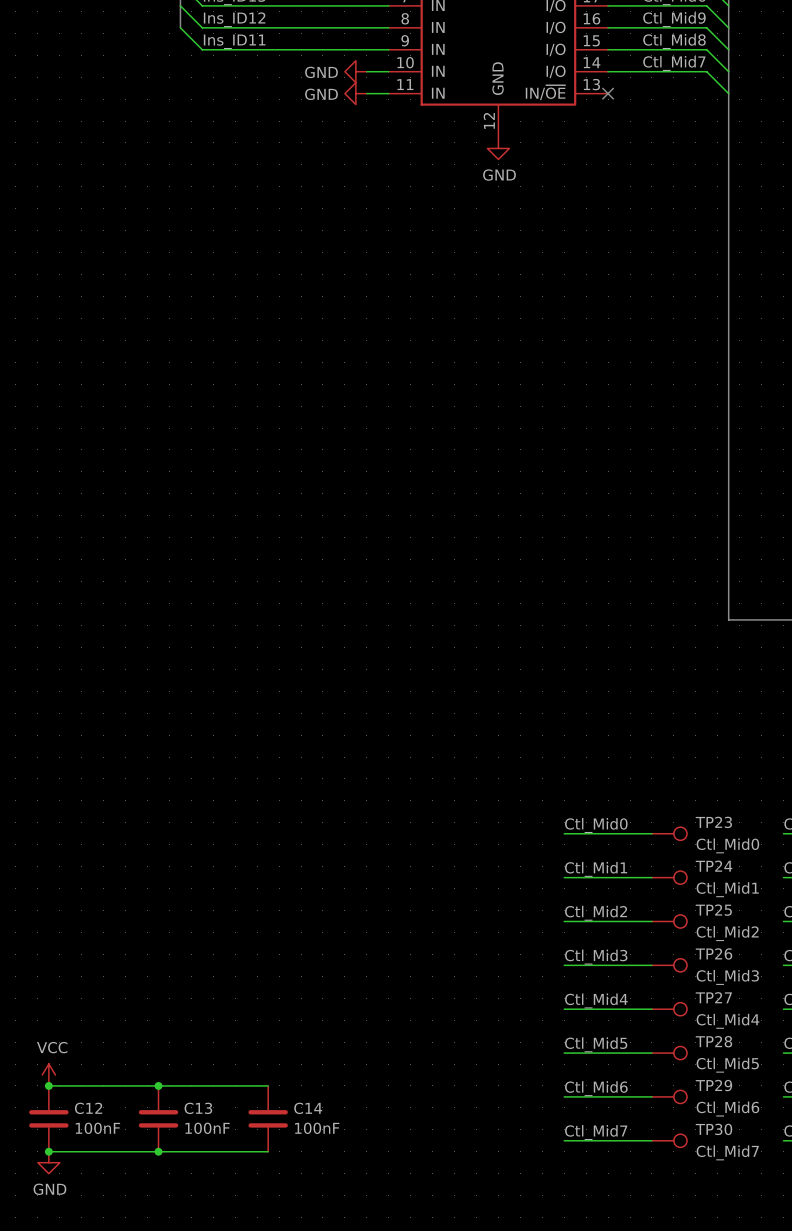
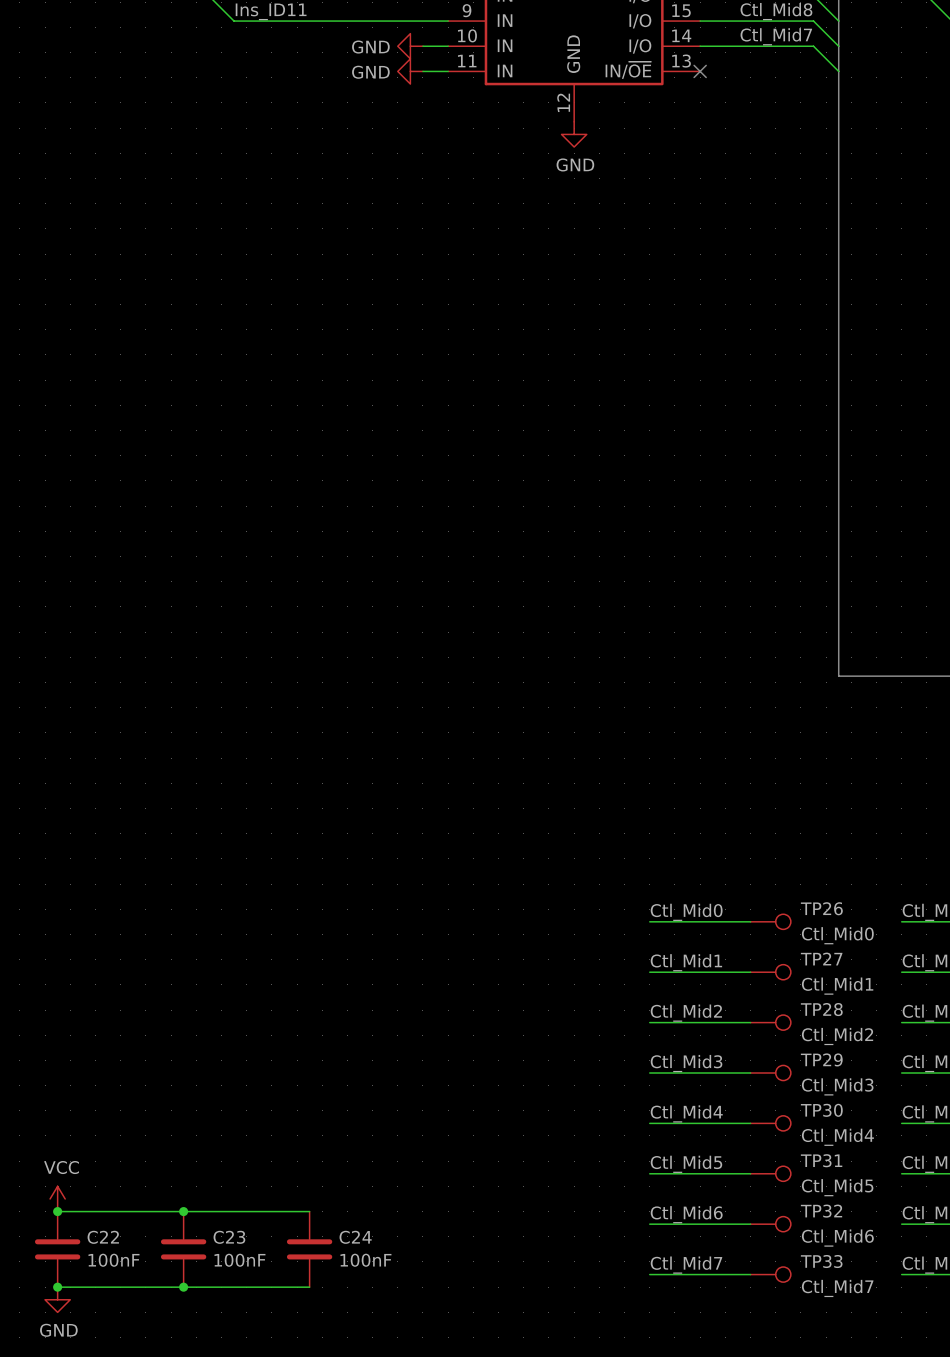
TP23 name: TP23 (713, 822) -> TP26 (821, 908)
TP24 name: TP24 (714, 866) -> TP27 (821, 959)
TP25 name: TP25 (713, 910) -> TP28 (821, 1009)
TP26 name: TP26 (713, 953) -> TP29 (821, 1059)
TP27 name: TP27 (713, 997) -> TP30 (821, 1110)
TP28 name: TP28 (713, 1041) -> TP31 (821, 1160)
TP29 name: TP29 (713, 1085) -> TP32 (821, 1211)
C12 name: C12 (88, 1108) -> C22 (103, 1237)
C13 name: C13 (198, 1108) -> C23 (229, 1237)
C14 name: C14 (308, 1108) -> C24 (355, 1237)
TP30 name: TP30 (713, 1129) -> TP33 (821, 1261)

